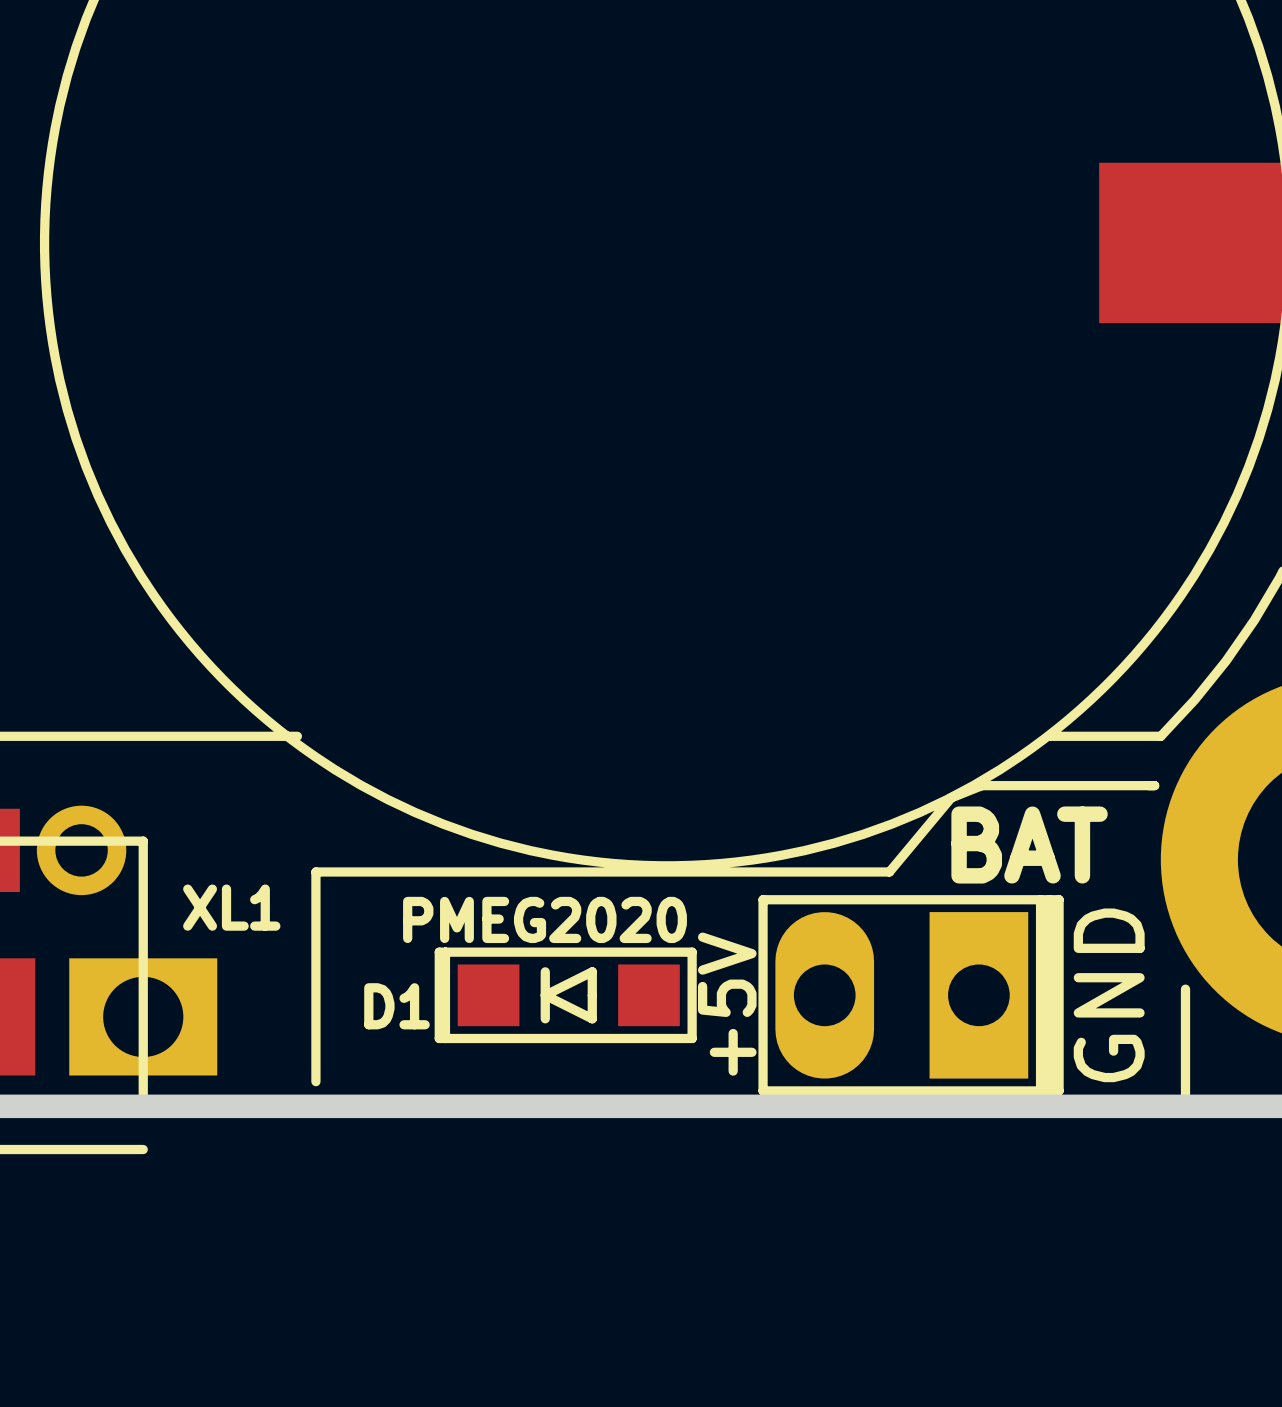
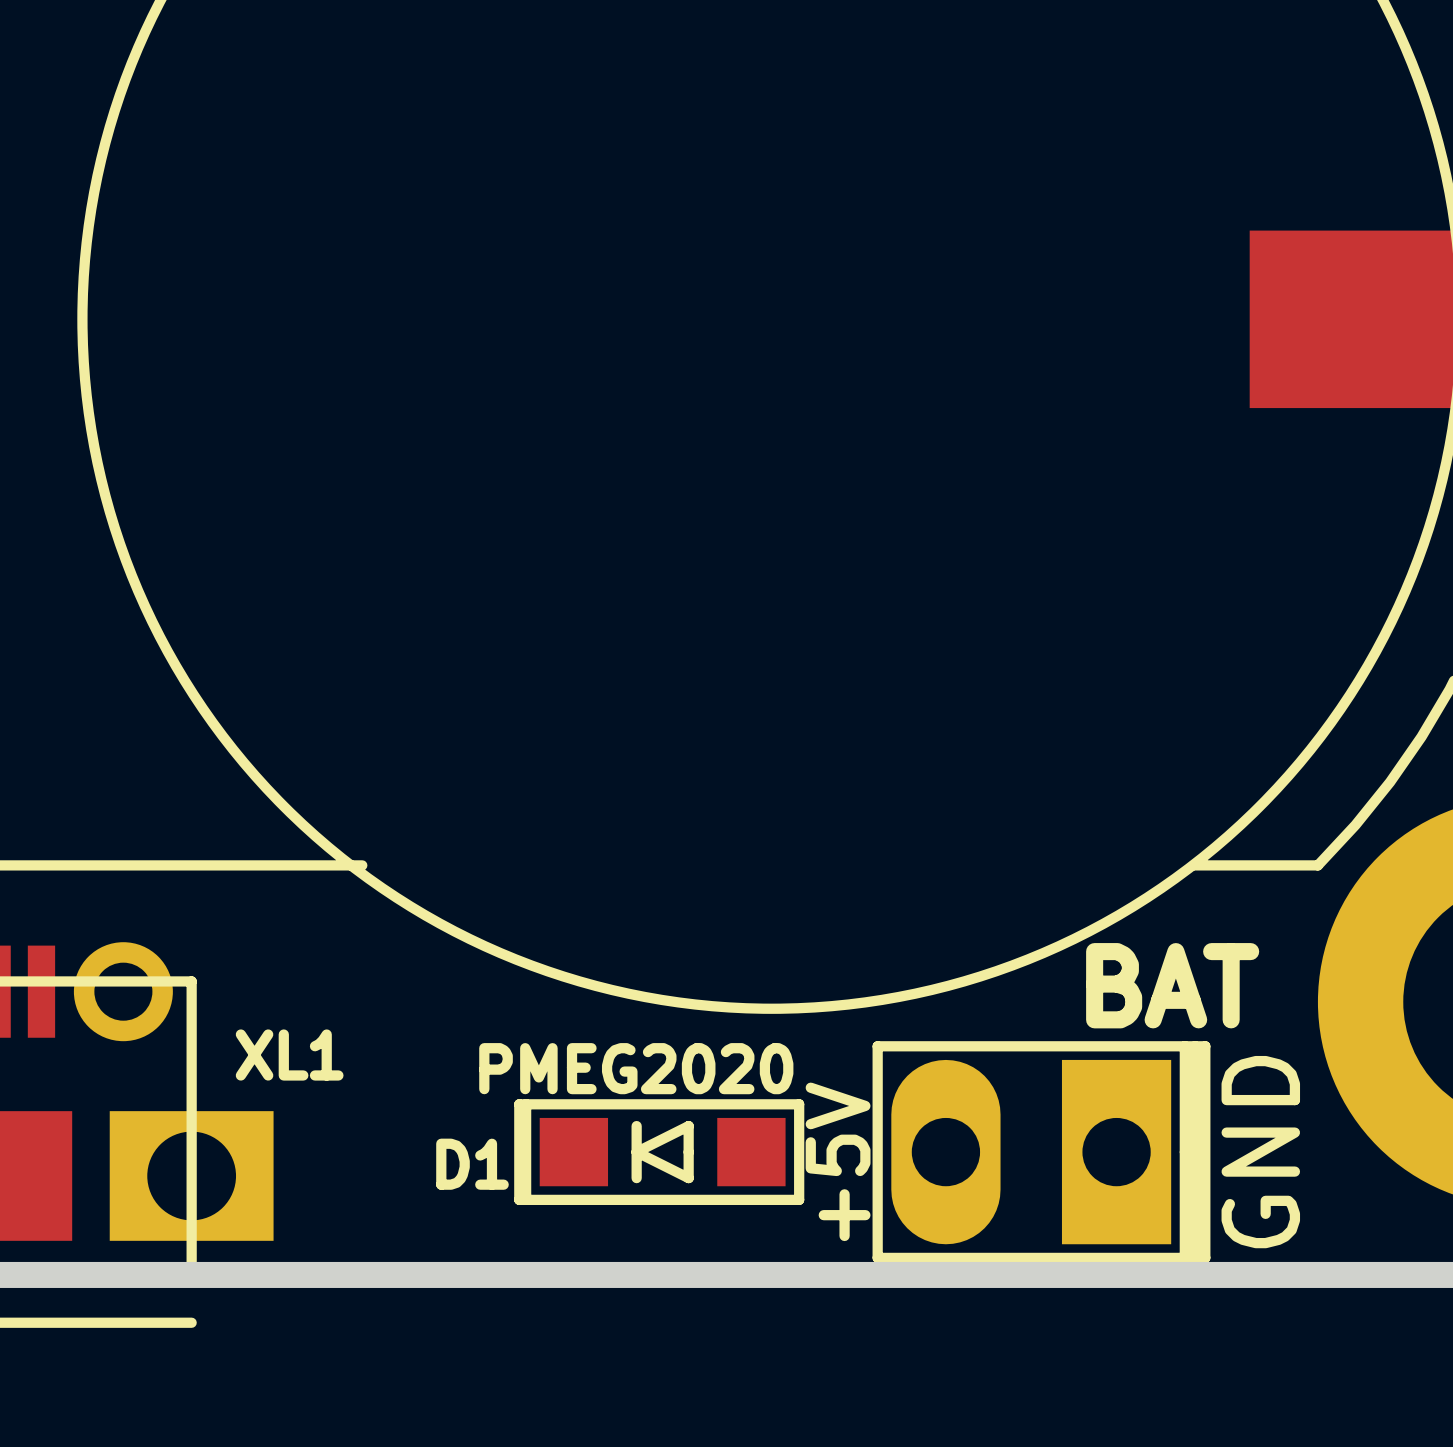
line: (1154, 785) (981, 785) (951, 797) (889, 871) (315, 871) (315, 1081) -> none
line: (1185, 989) (1185, 1100) -> none

